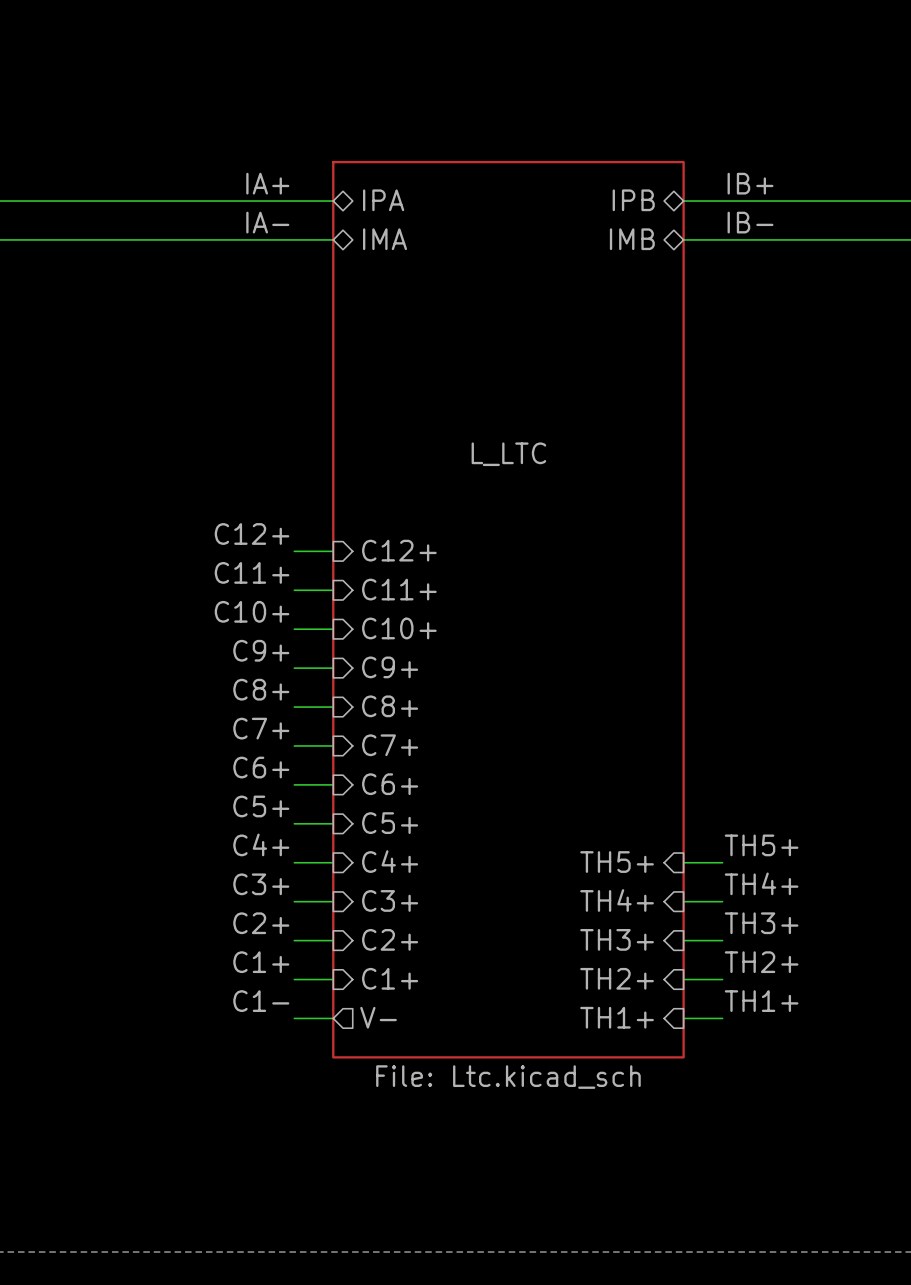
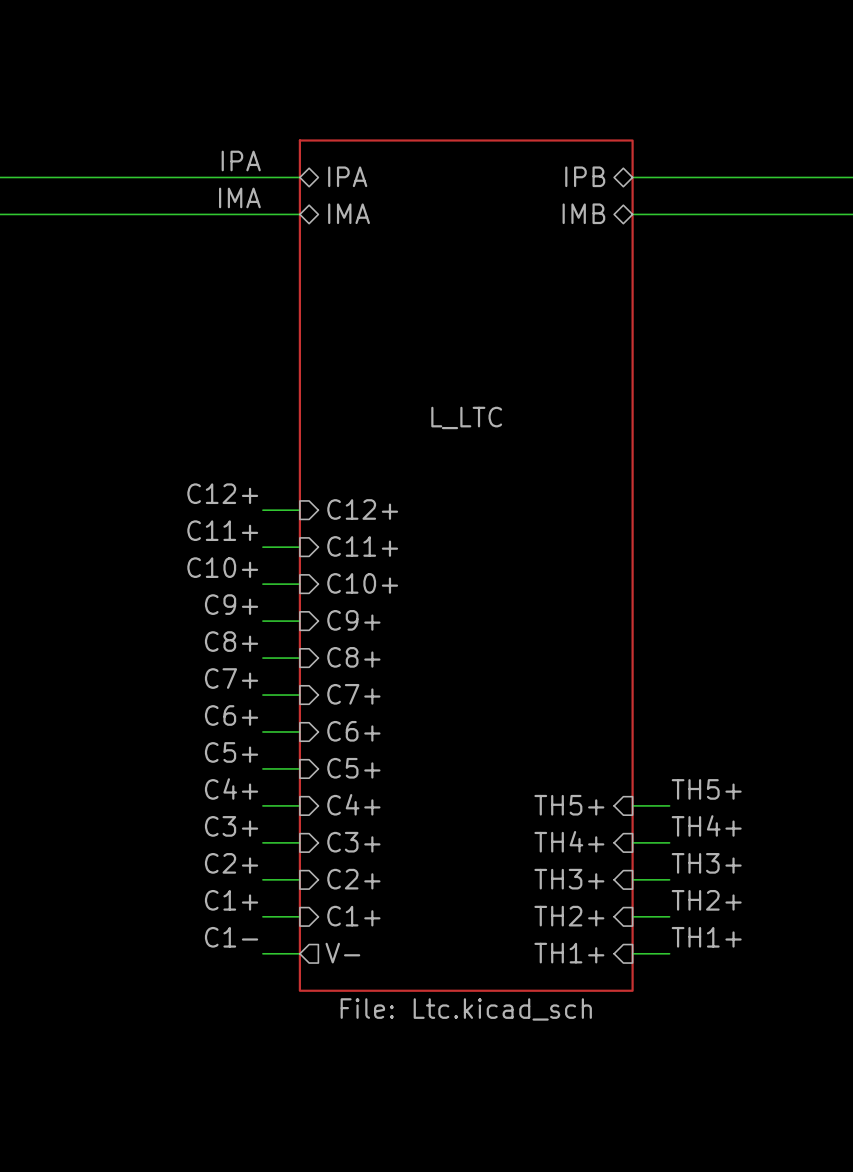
label: IA+ (267, 183) -> IPA (241, 160)
label: IB+ (750, 183) -> none
label: IA- (267, 222) -> IMA (239, 197)
label: IB- (750, 222) -> none

